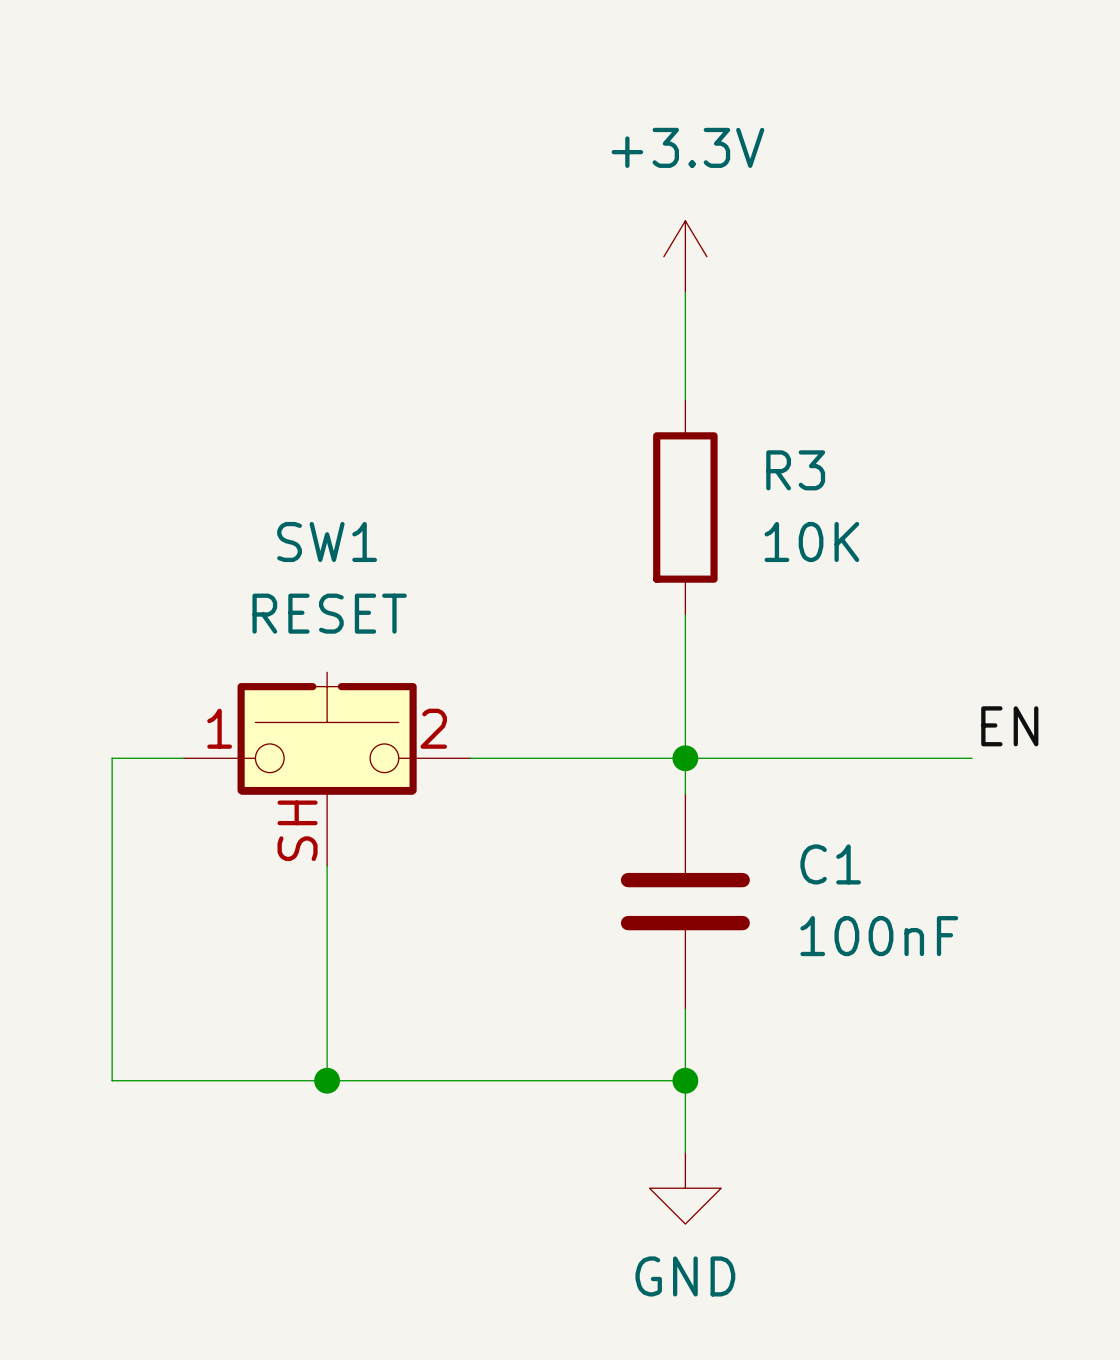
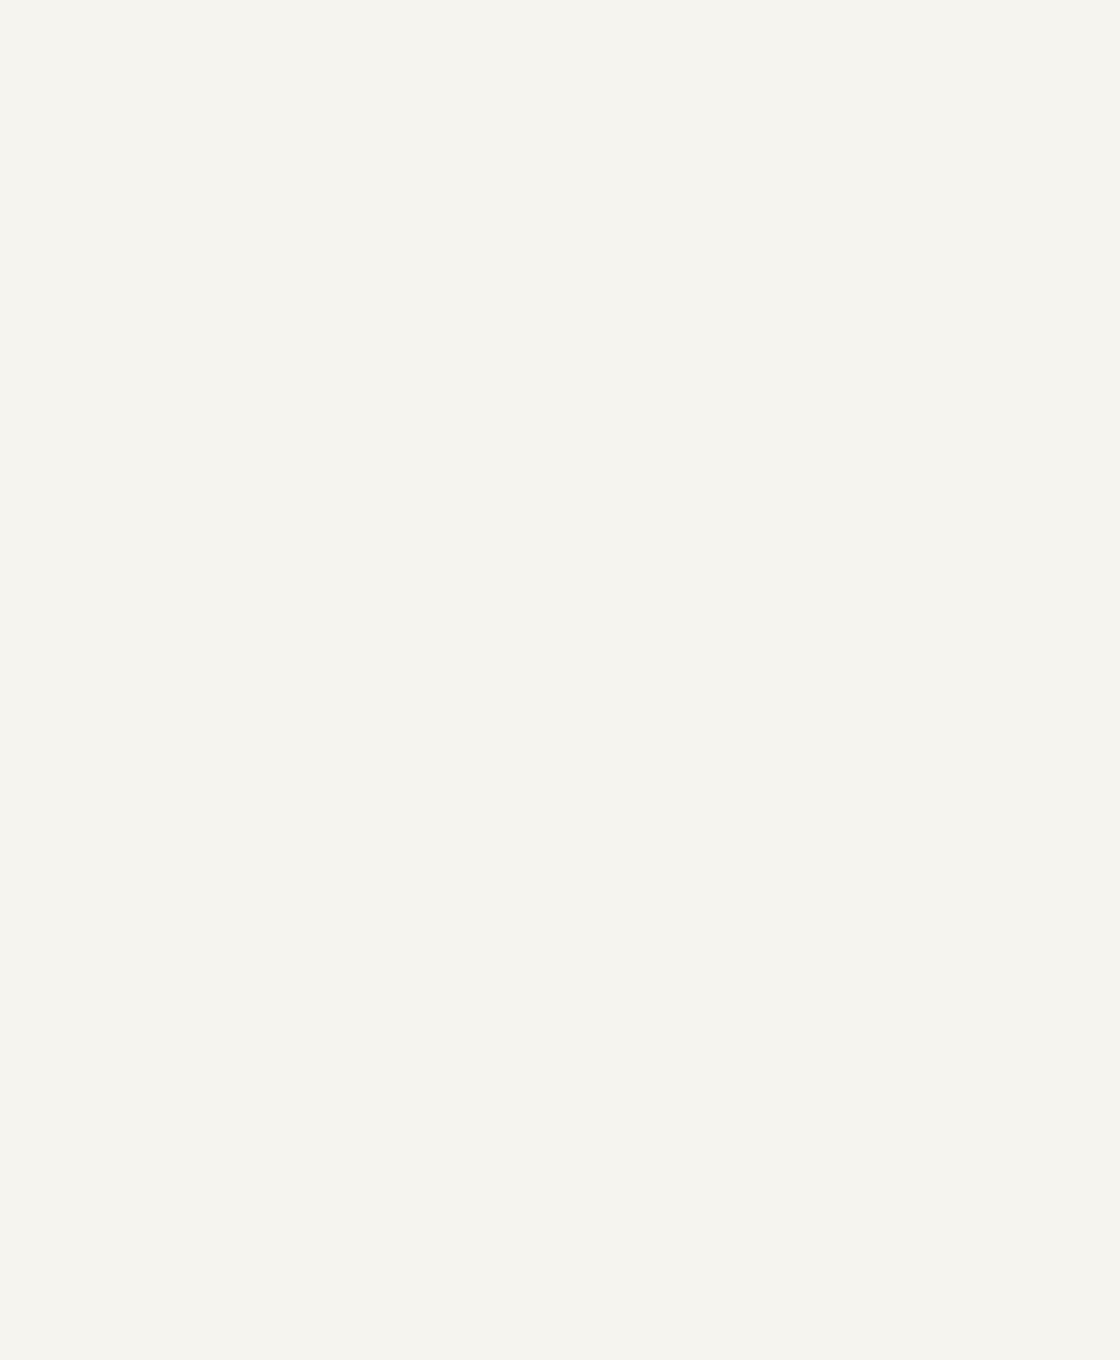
power symbol: +3.3V (685, 256) -> none
wire: (685, 292) (685, 400) -> none
R3: 10K (685, 507) -> none
wire: (685, 614) (685, 794) -> none
label: EN (1009, 726) -> none
wire: (183, 758) (112, 758) (112, 1080) (685, 1080) -> none
wire: (470, 758) (972, 758) -> none
junction: (685, 758) -> none
SW1: RESET (327, 769) -> none
wire: (327, 865) (327, 1080) -> none
C1: 100nF (685, 901) -> none
wire: (685, 1009) (685, 1152) -> none
junction: (327, 1080) -> none
junction: (685, 1080) -> none
power symbol: GND (685, 1188) -> none

